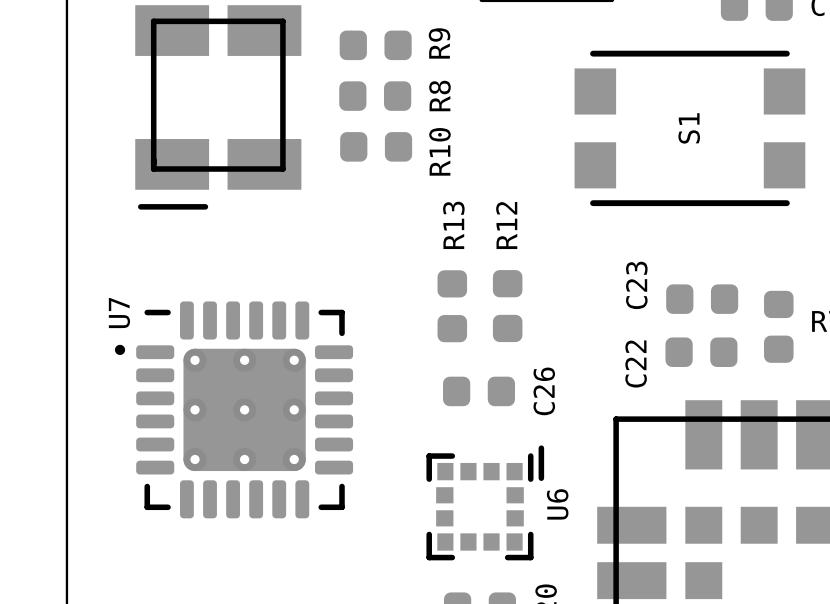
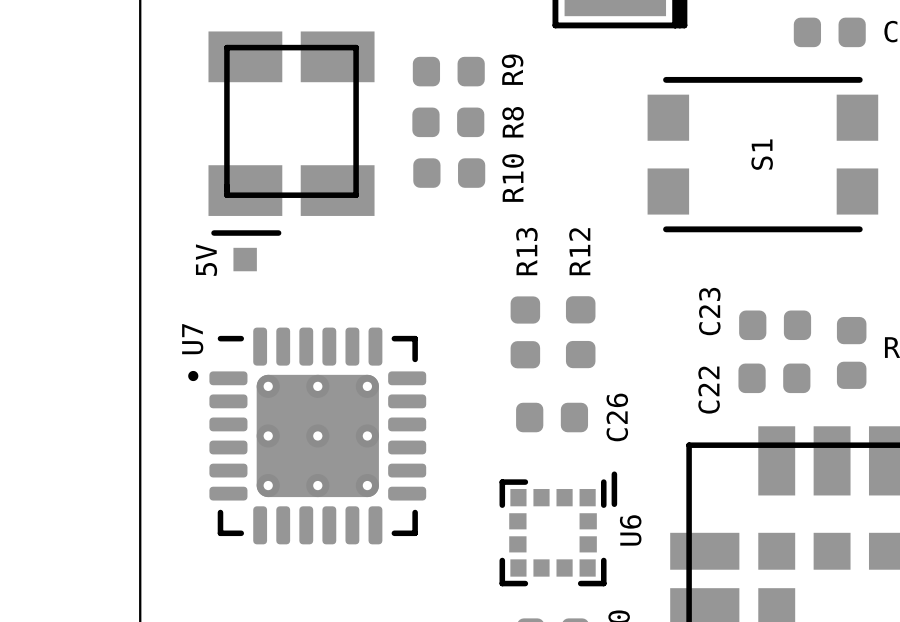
5V: none -> (245, 259)

